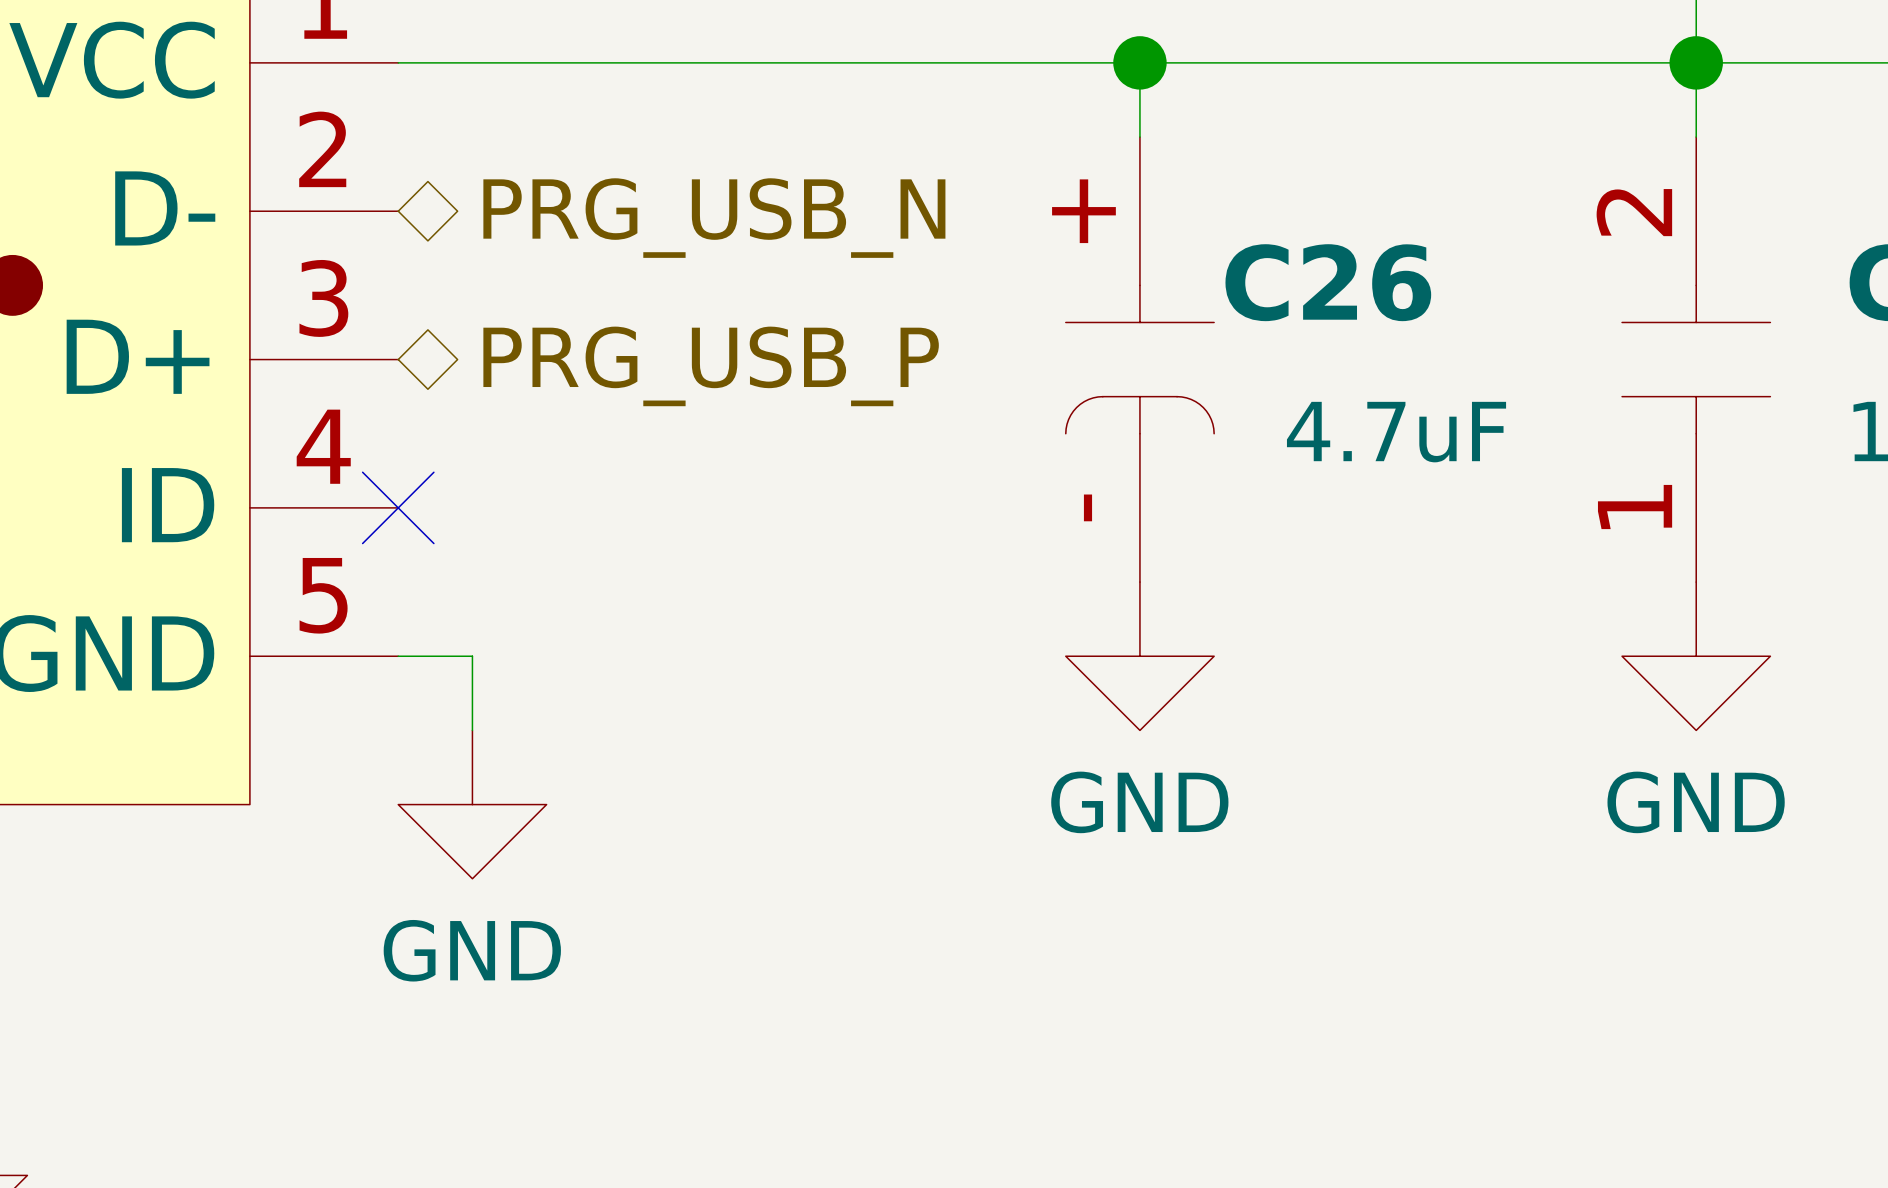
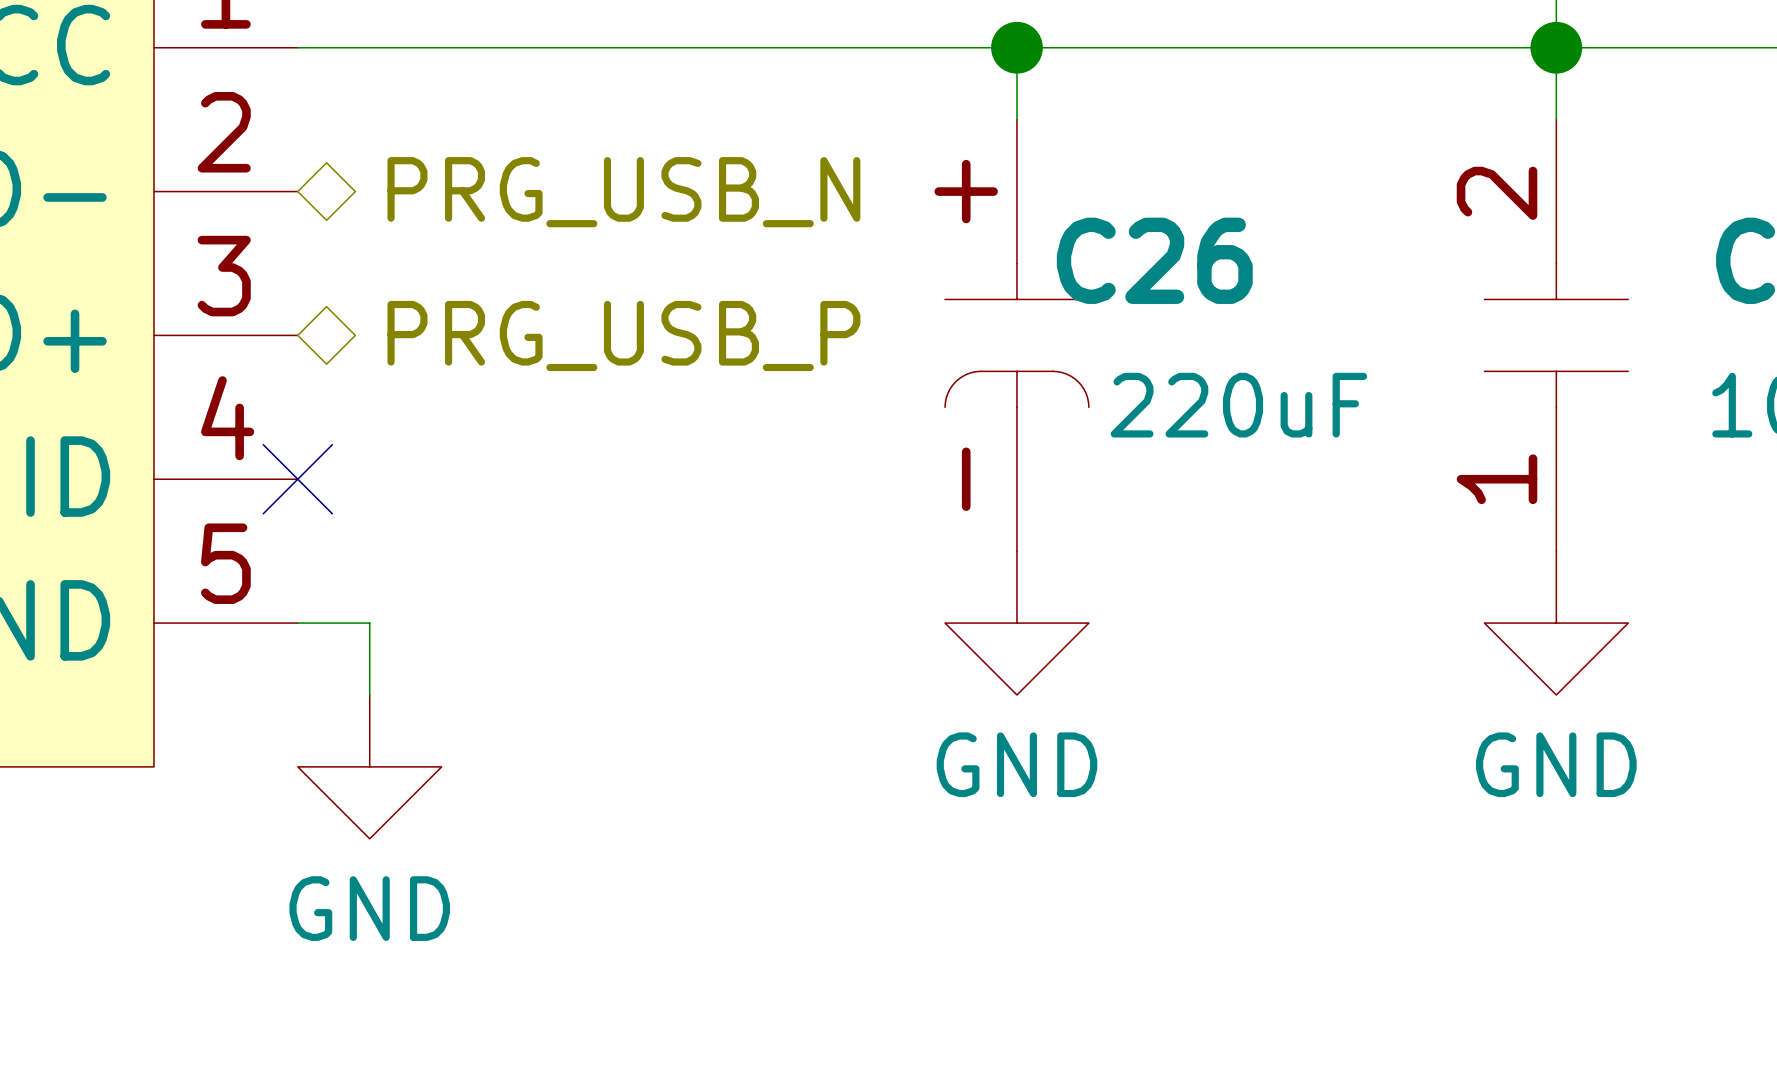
C26 name position: C26 (1328, 282) -> C26 (1154, 260)
C26 value: 4.7uF (1396, 432) -> 220uF (1238, 405)

